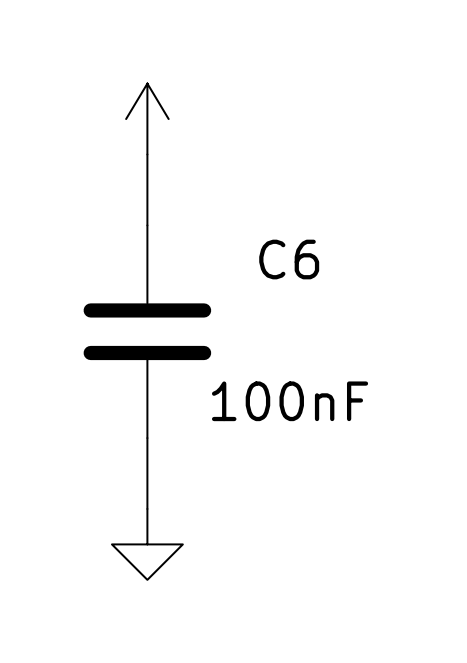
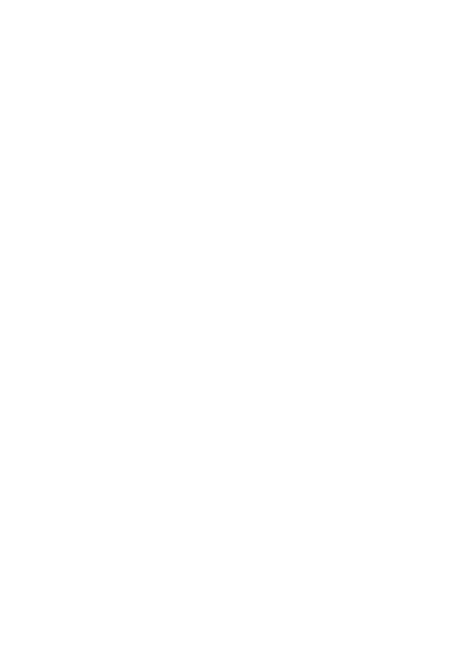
power symbol: (147, 119) -> none
wire: (147, 154) (147, 225) -> none
C6: 100nF (147, 331) -> none
wire: (147, 438) (147, 508) -> none
power symbol: (147, 544) -> none

